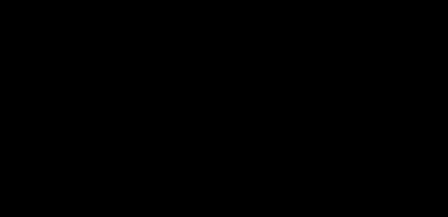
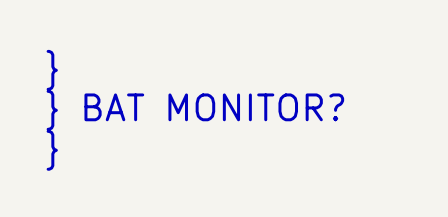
text: none -> } (52, 70)
text: none -> } BAT MONITOR? (195, 110)
text: none -> } (52, 150)

